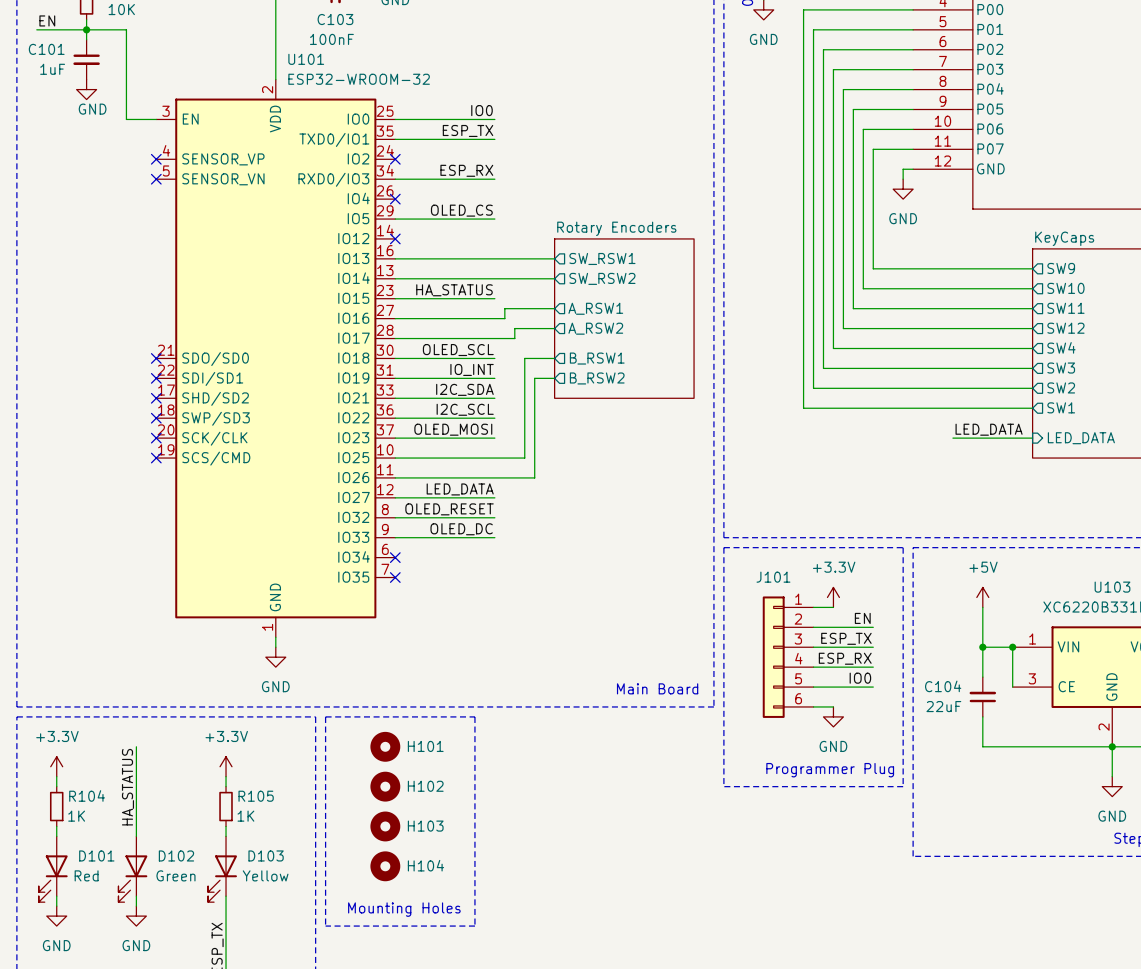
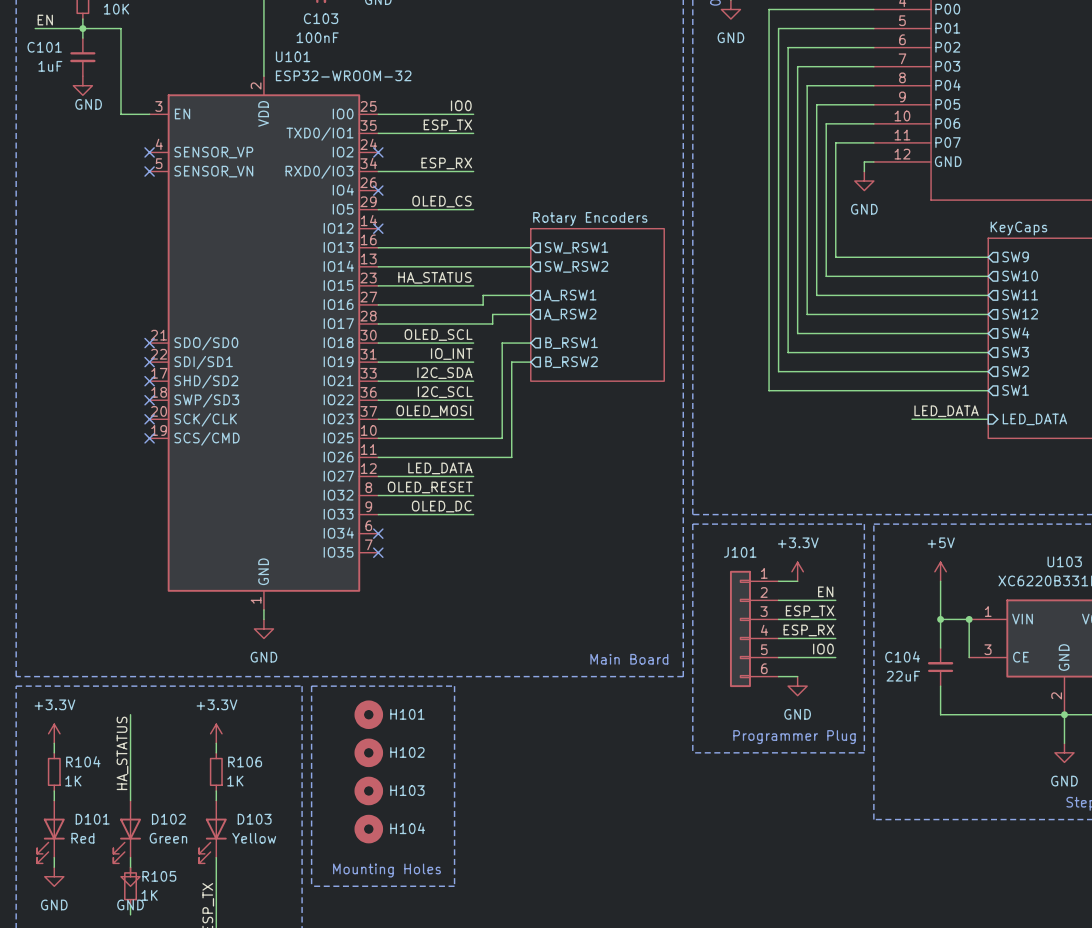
R105 name: R105 (256, 796) -> R106 (245, 762)
R105: none -> 1K (130, 886)
wire: none -> (130, 905) (130, 914)

